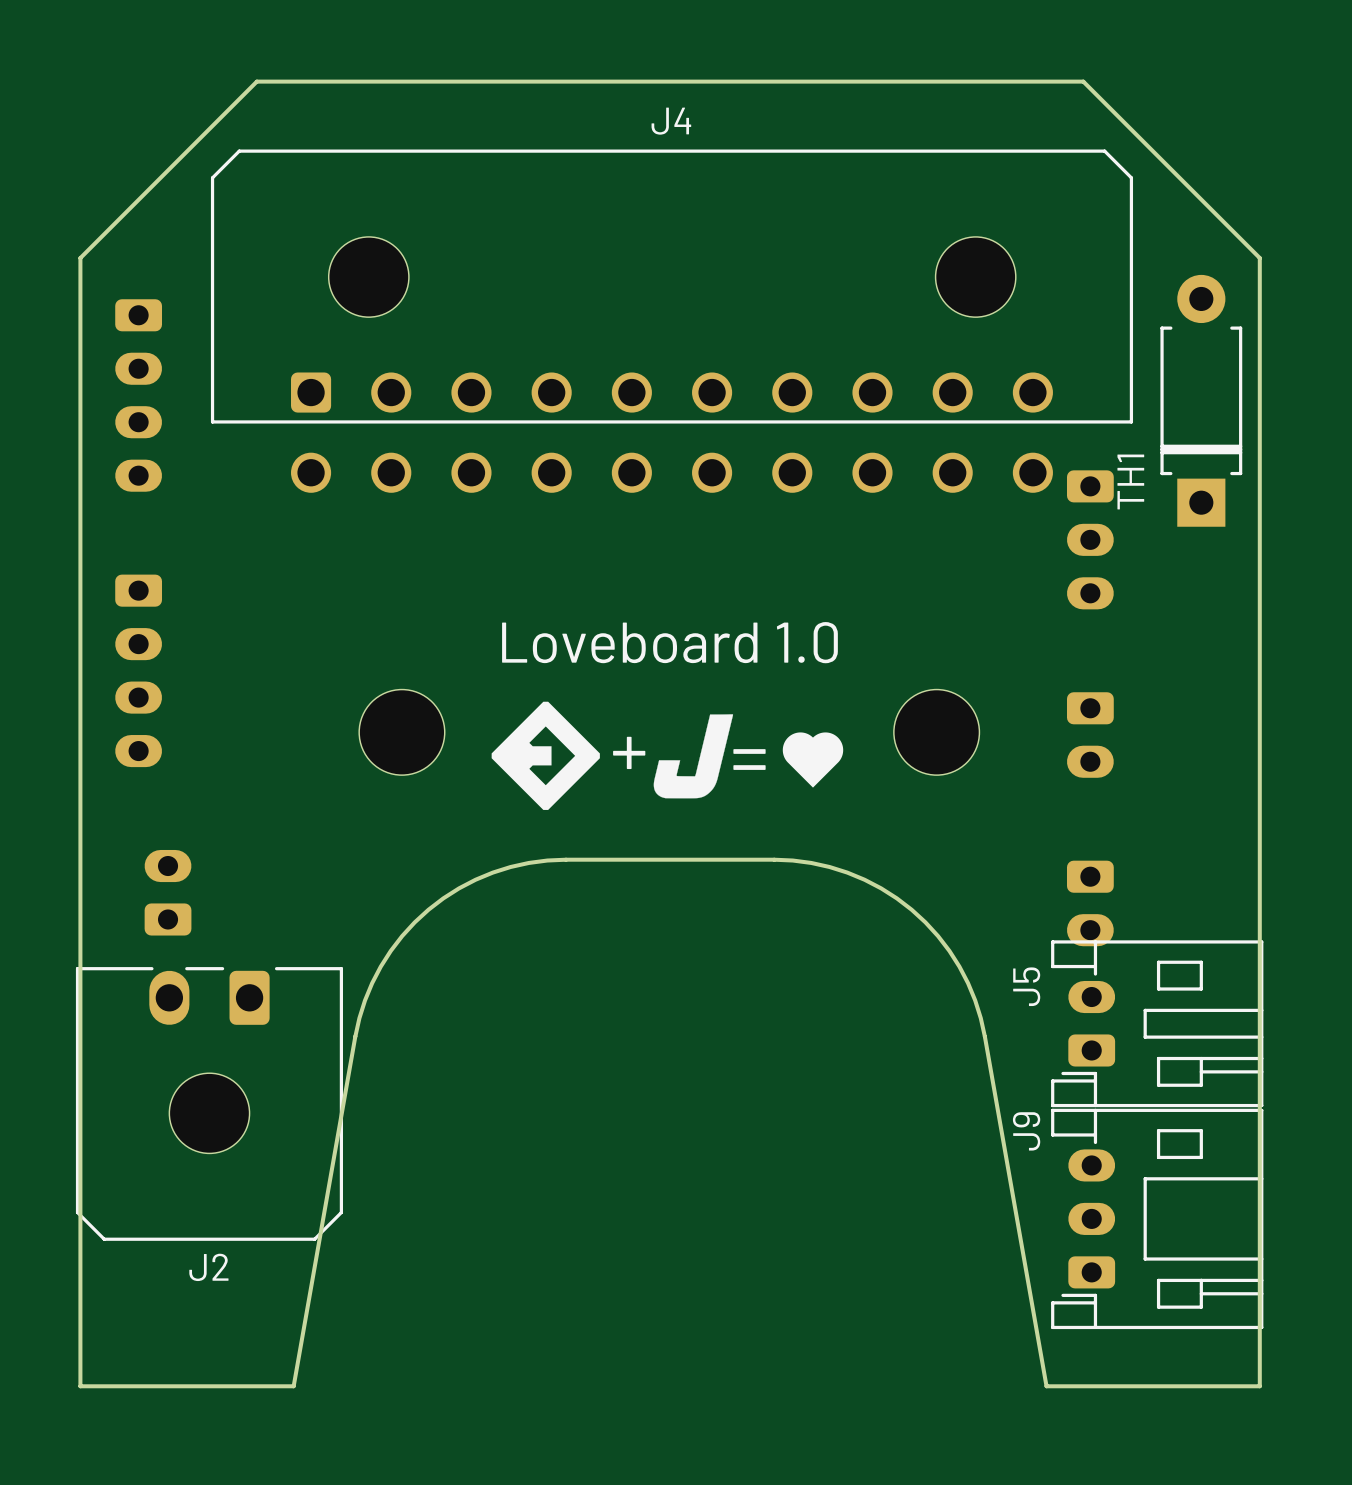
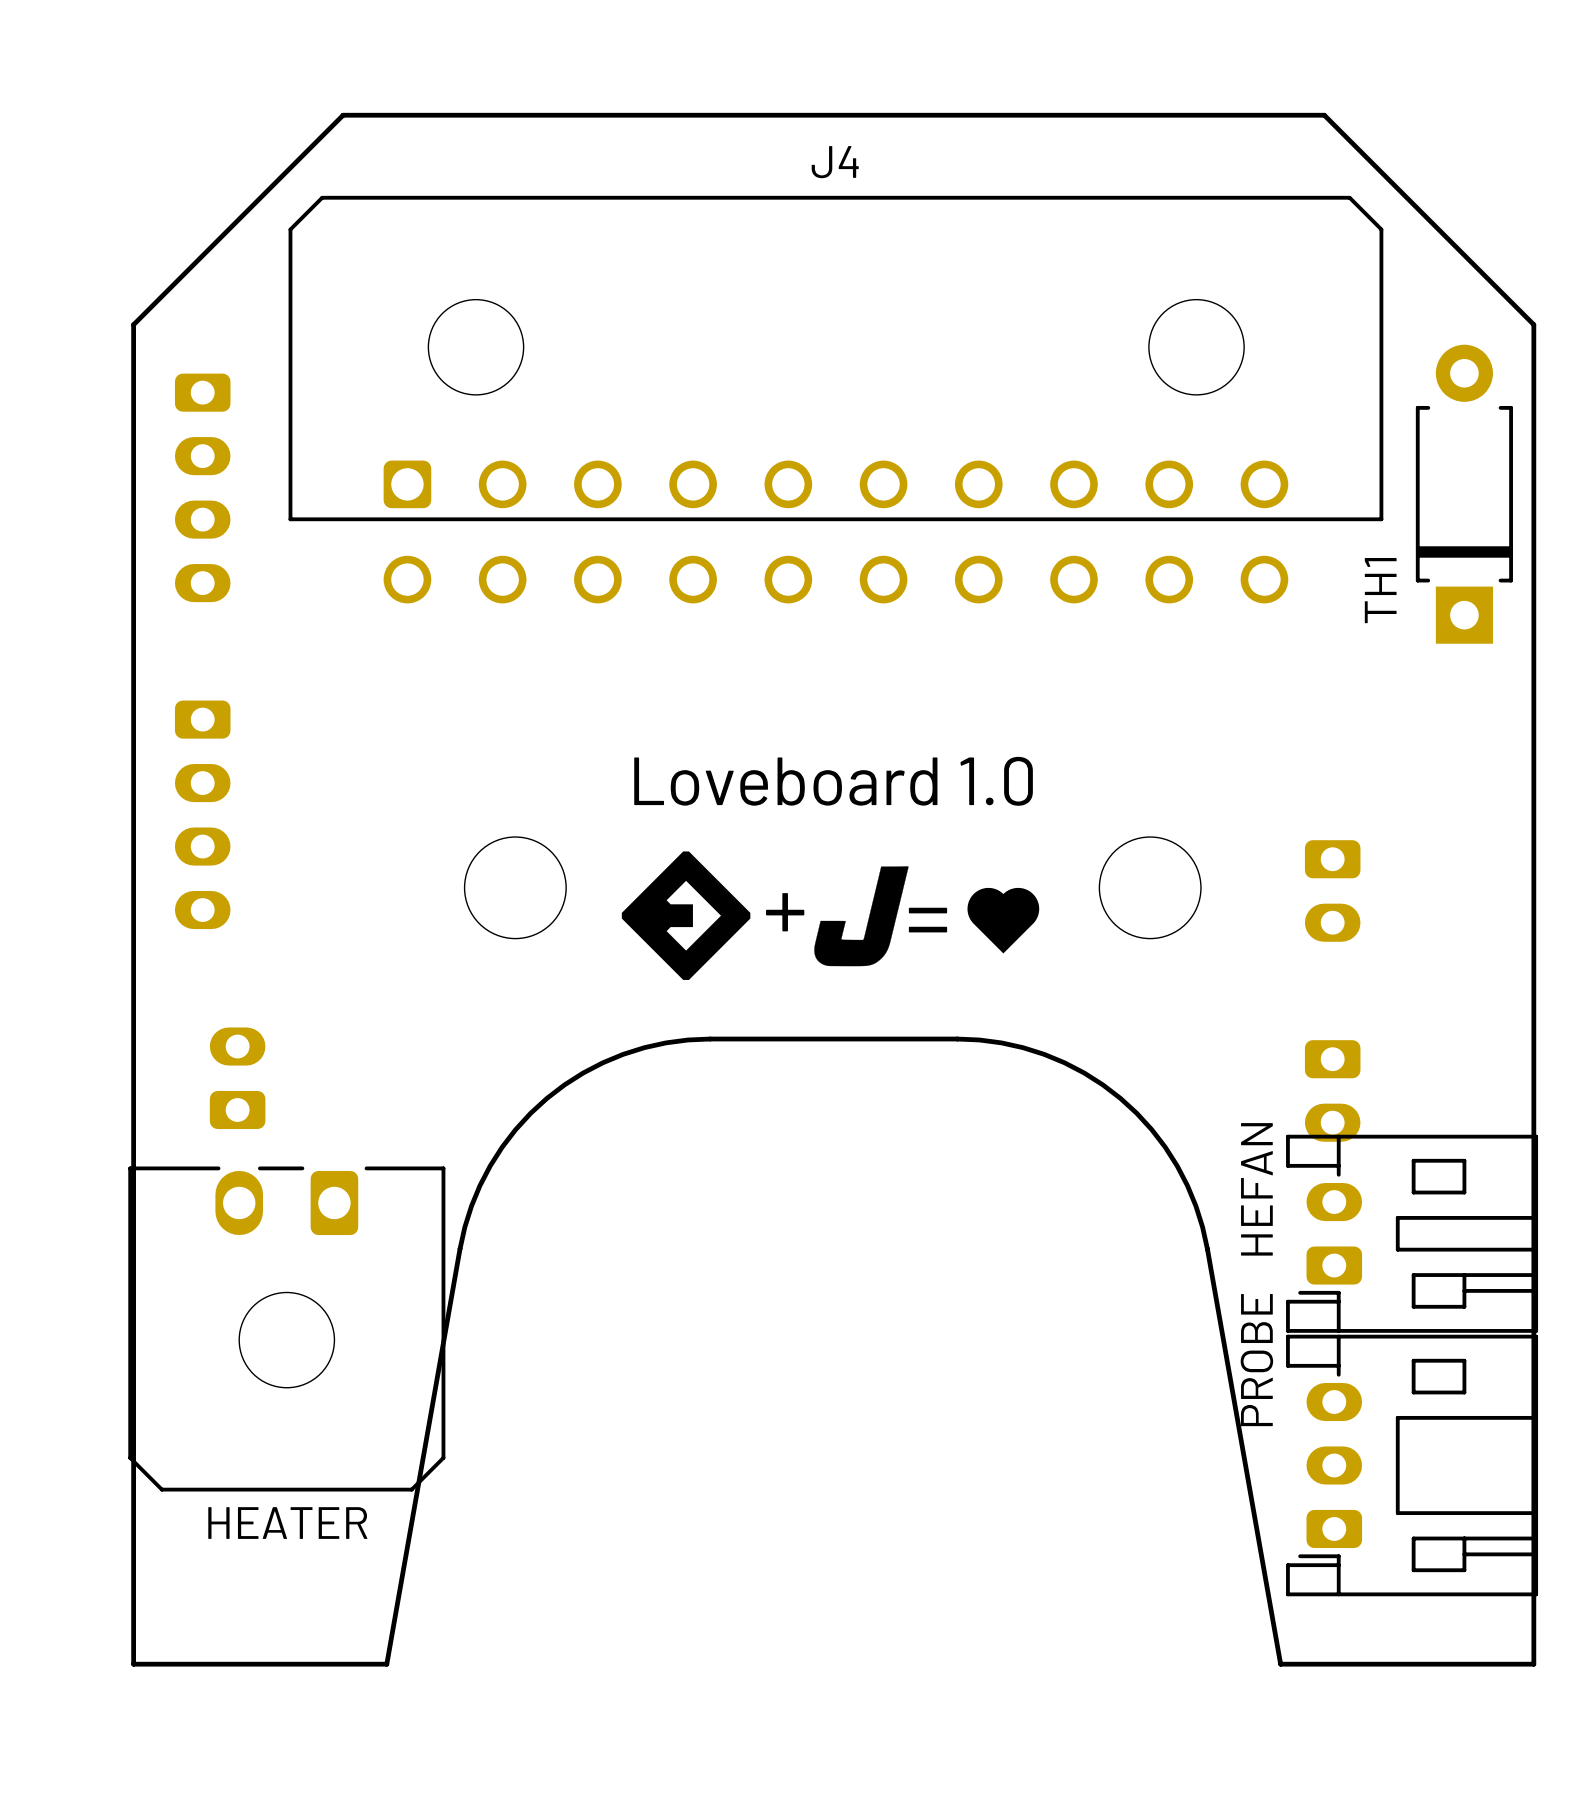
part: (1090, 539) -> none
J5 name: J5 (1026, 986) -> HEFAN (1256, 1189)
J9 name: J9 (1026, 1131) -> PROBE (1256, 1360)
J2 name: J2 (208, 1267) -> HEATER (287, 1523)

